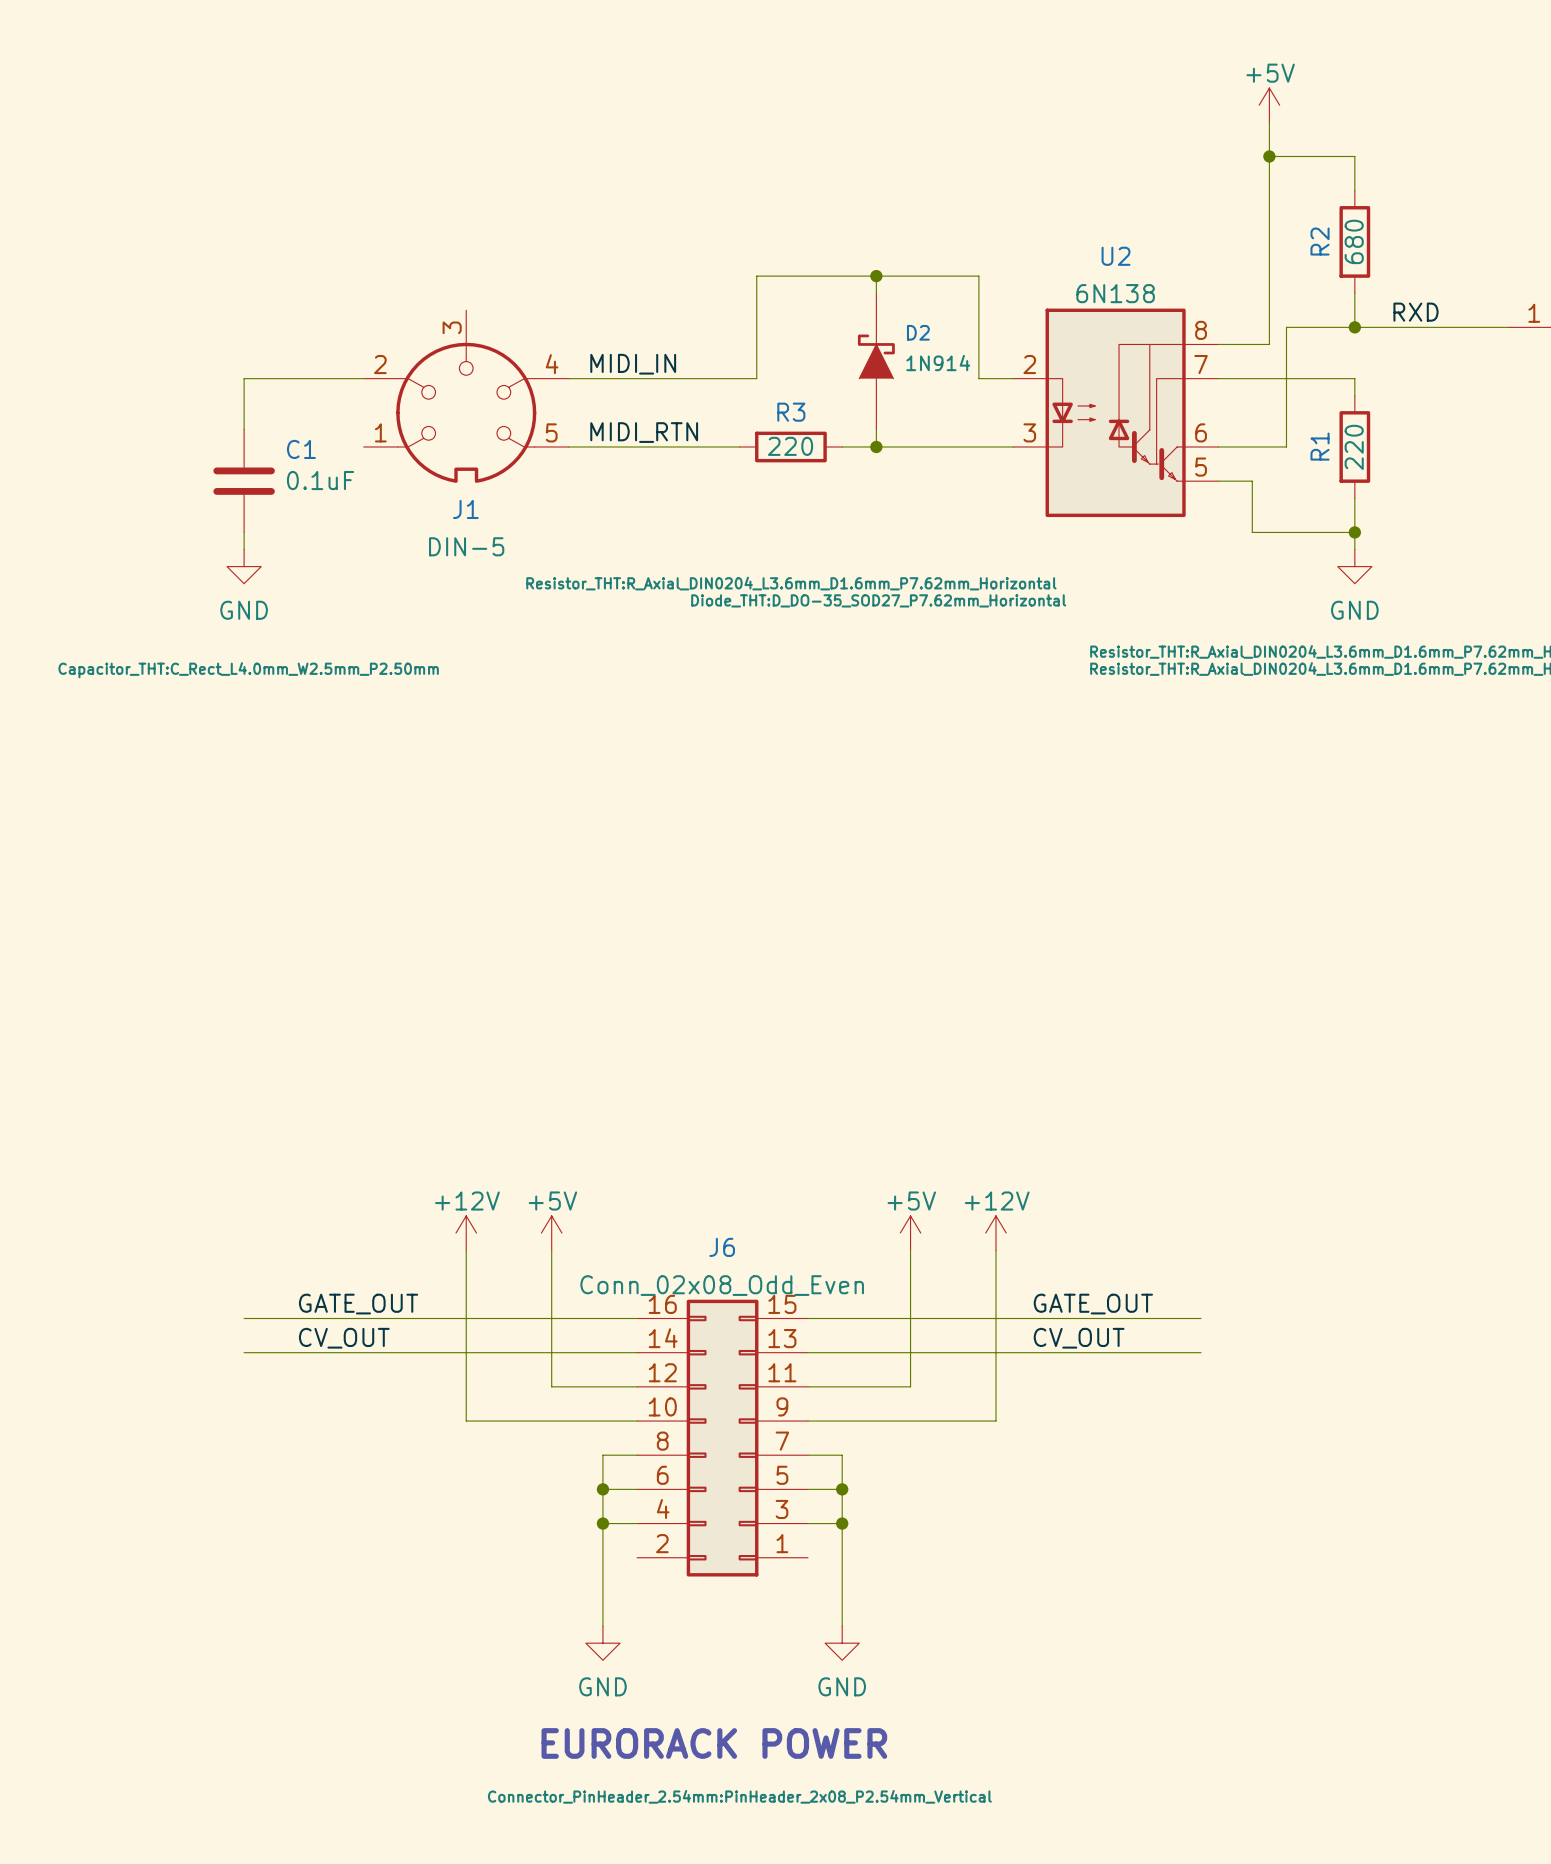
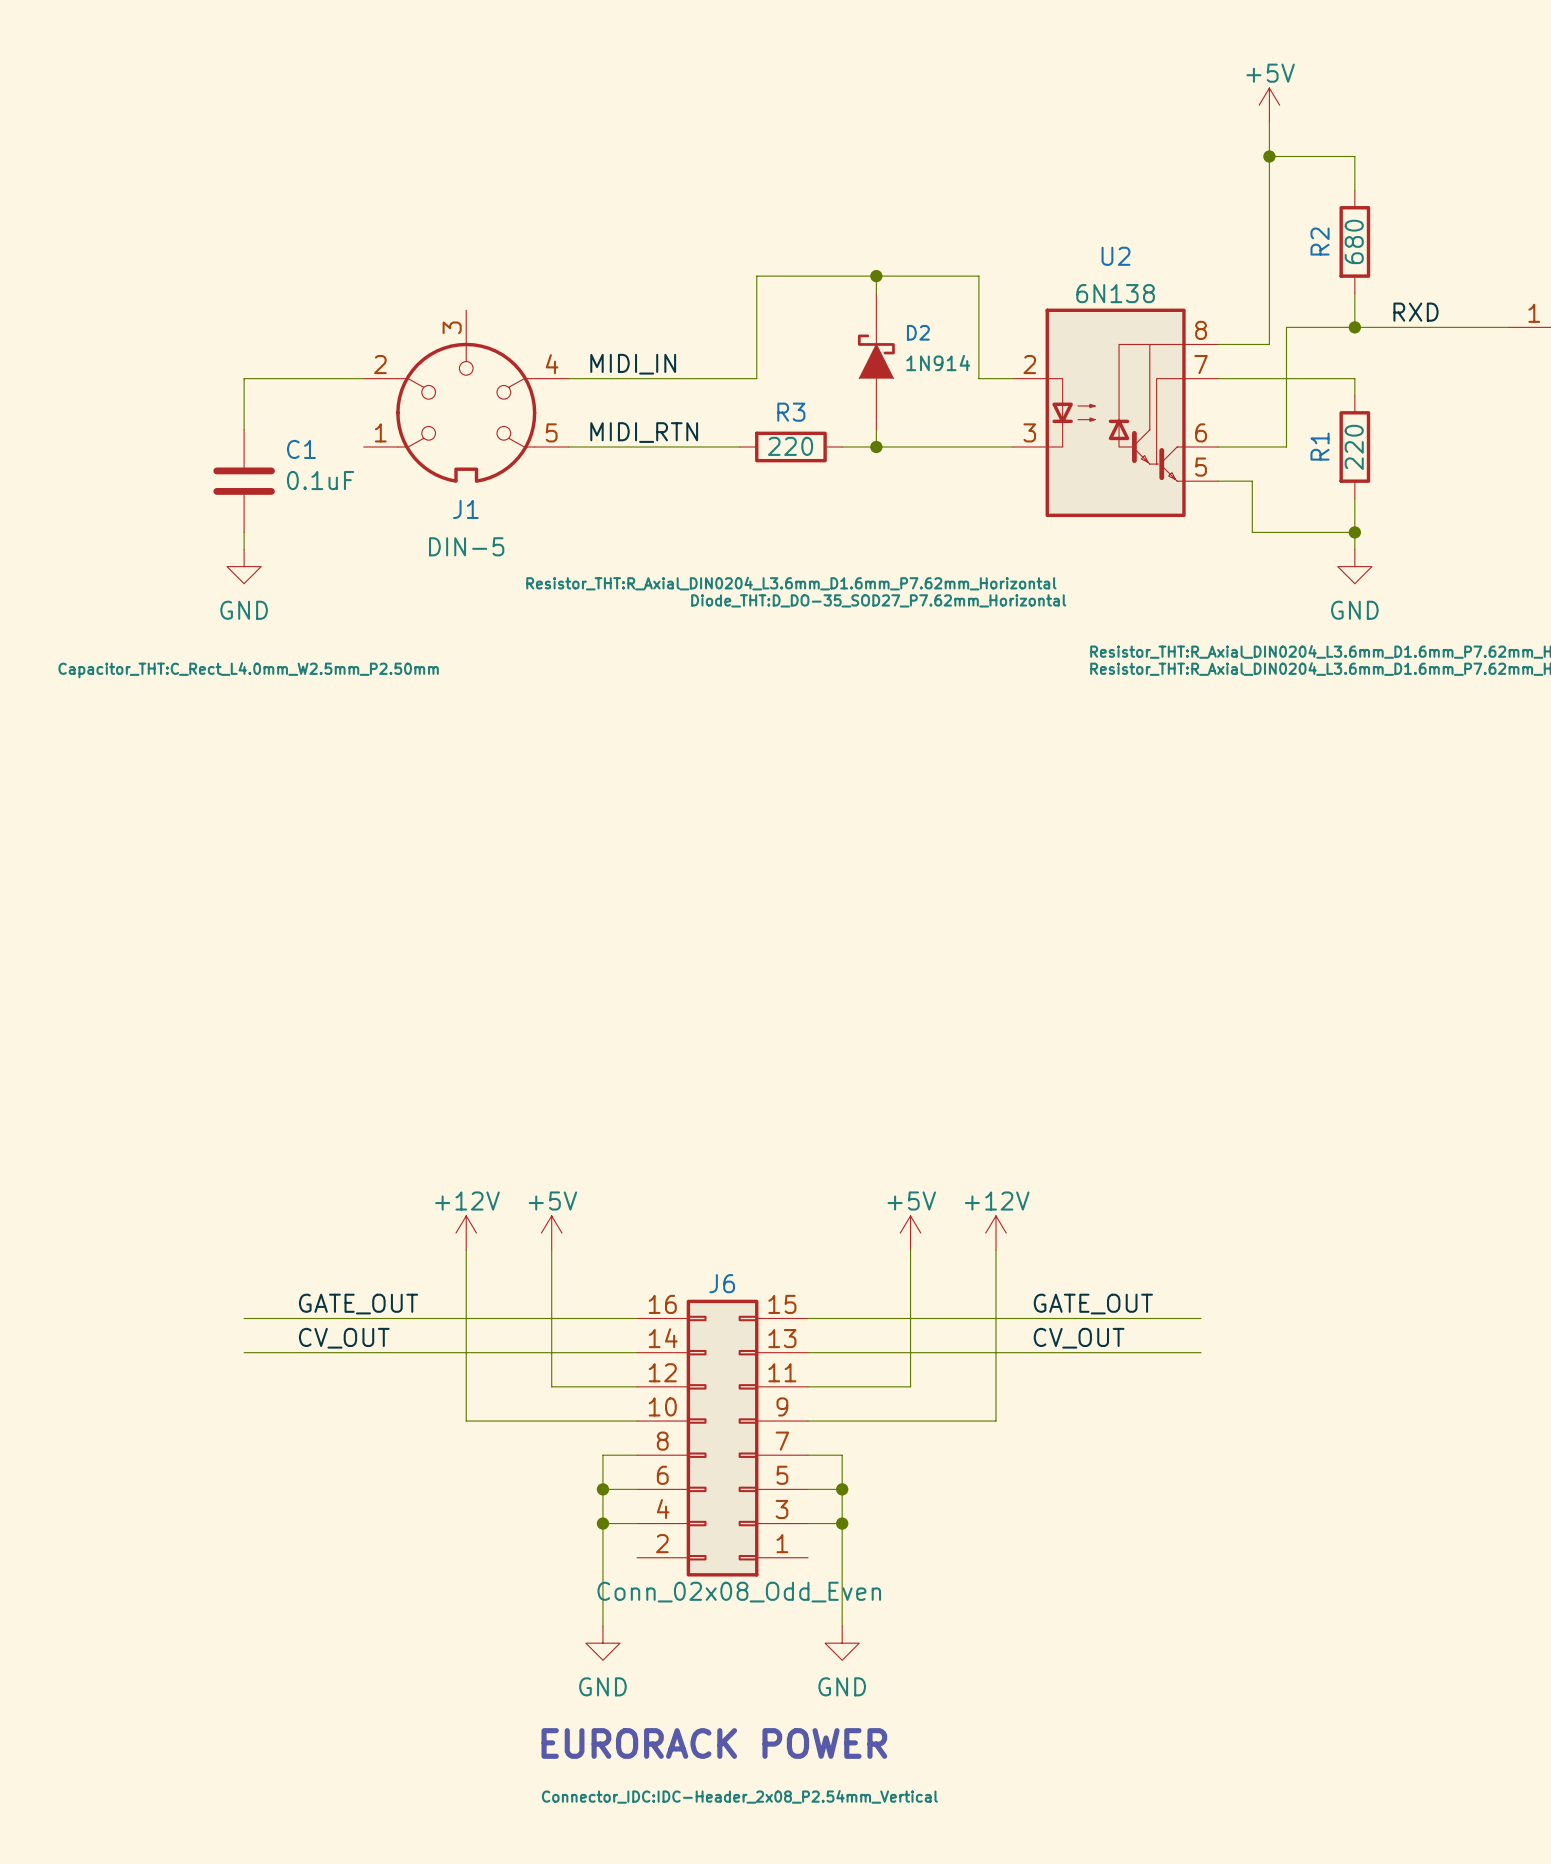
J6 name position: J6 (722, 1247) -> J6 (722, 1283)
J6 value position: Conn_02x08_Odd_Even (722, 1285) -> Conn_02x08_Odd_Even (739, 1592)
J6 text: Connector_PinHeader_2.54mm:PinHeader_2x08_P2.54mm_Vertical (739, 1796) -> Connector_IDC:IDC-Header_2x08_P2.54mm_Vertical (739, 1796)

